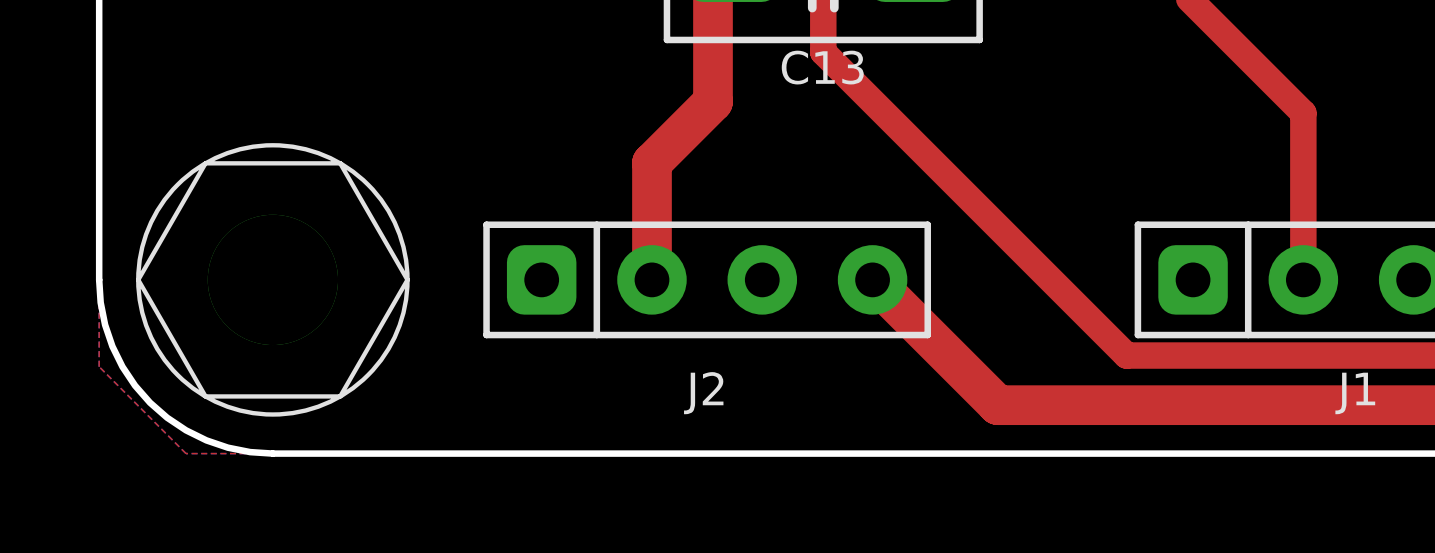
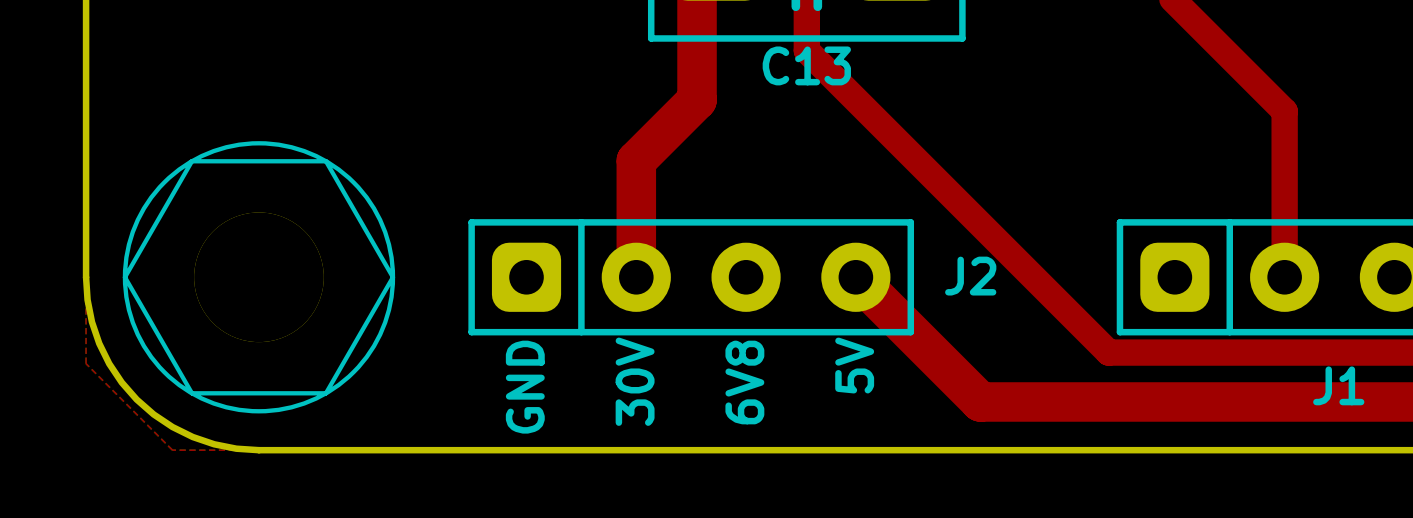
J2 text: none -> 5V (854, 365)
J2 text: none -> 30V (635, 381)
J2 text: none -> 6V8 (744, 382)
J2 text: none -> GND (525, 387)
J2 name position: J2 (703, 393) -> J2 (970, 276)

